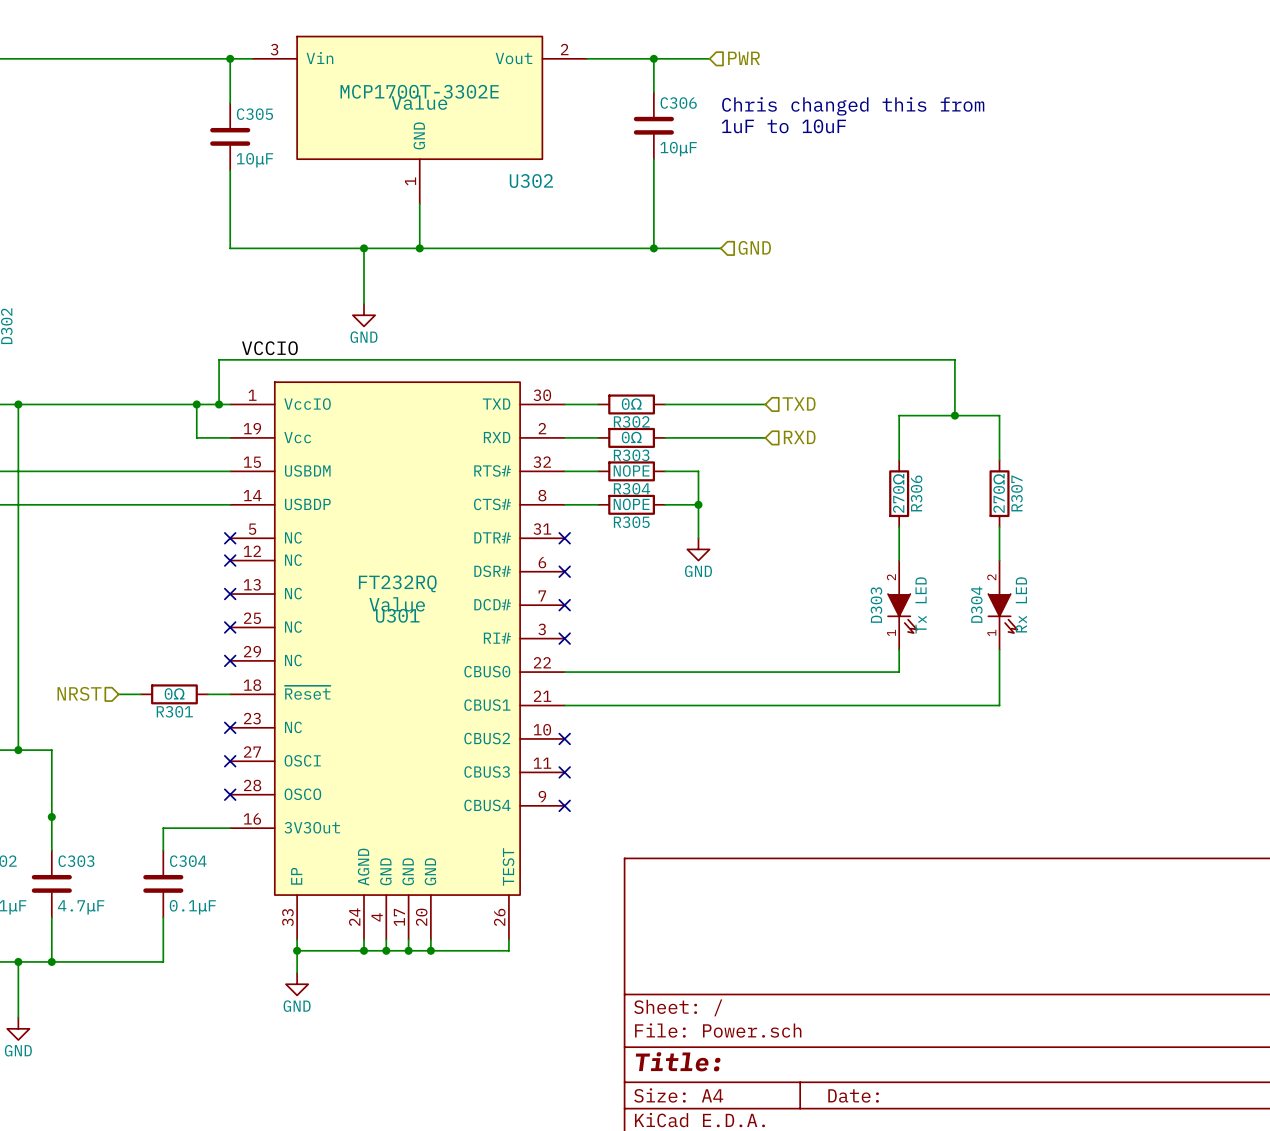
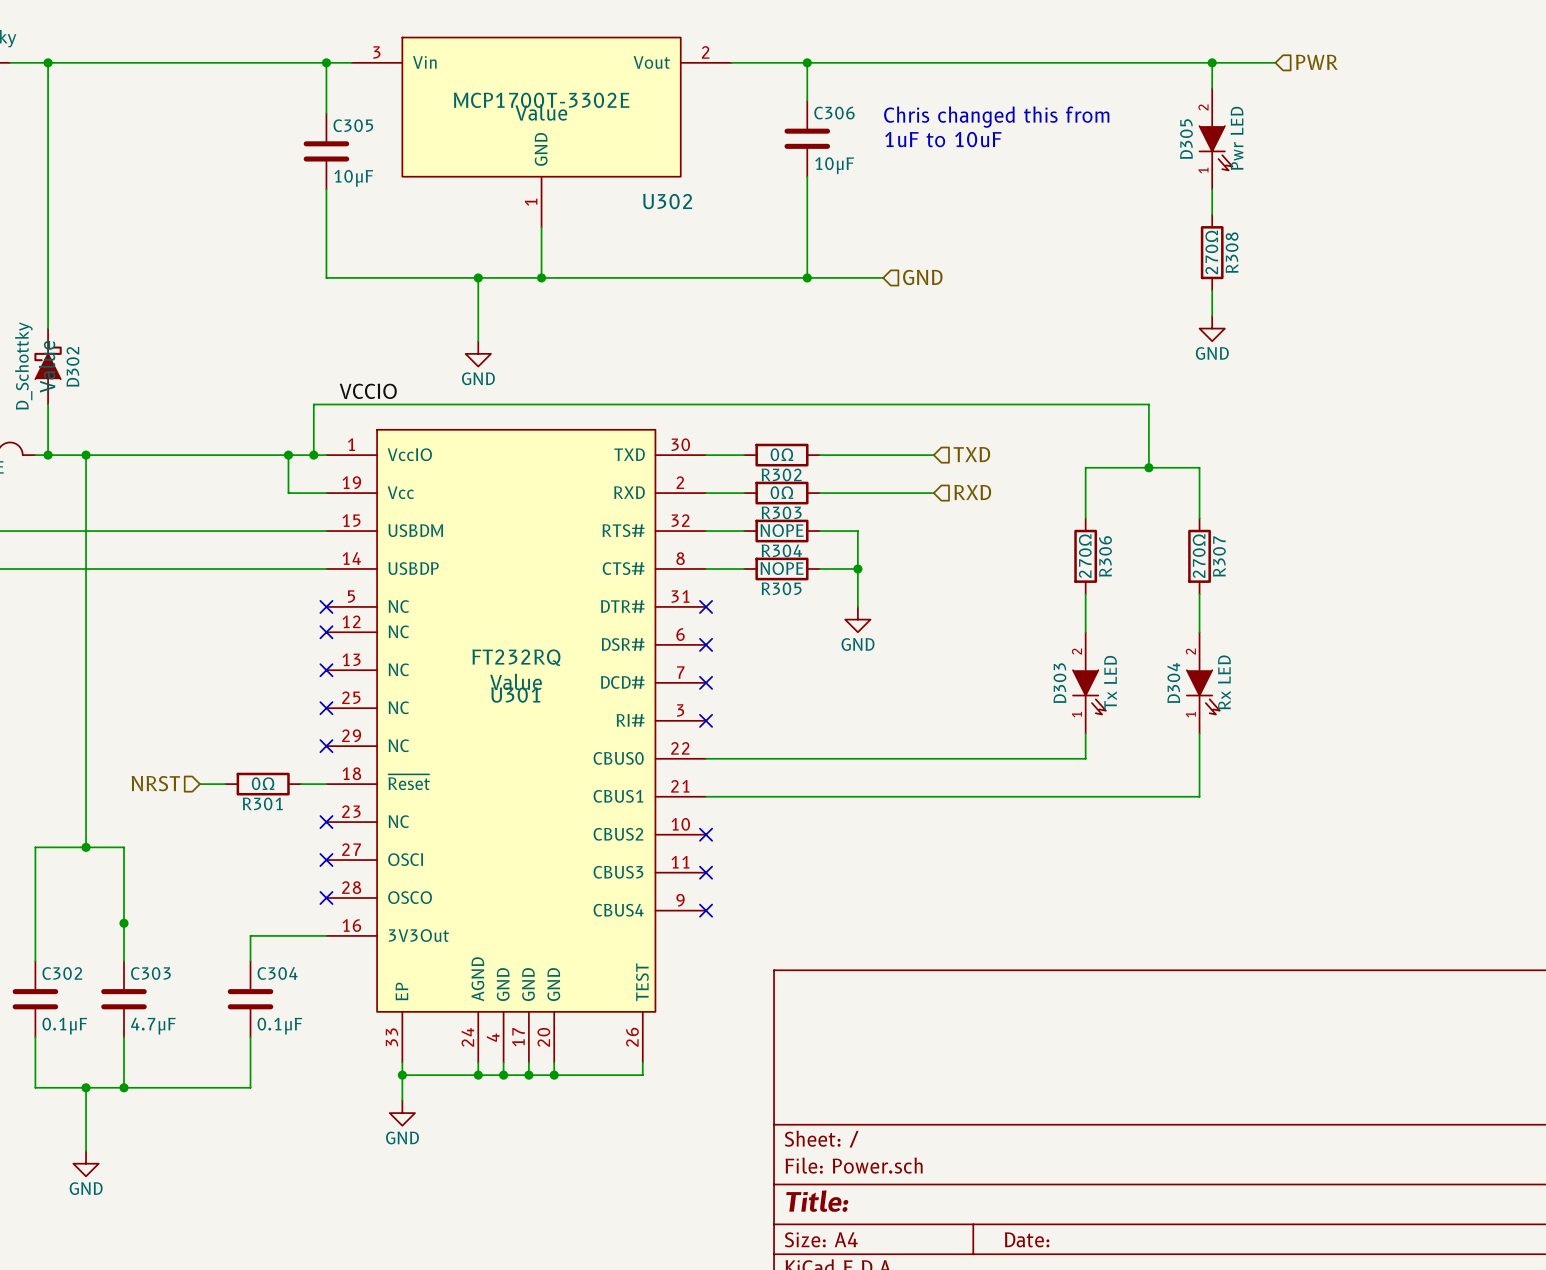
wire: none -> (870, 62) (1275, 62)
hierarchical label: PWR (743, 58) -> none
wire: none -> (1212, 62) (1212, 88)
junction: none -> (1212, 62)
hierarchical label: none -> PWR (1316, 62)
D305: none -> Pwr LED (1215, 138)
wire: none -> (1212, 189) (1212, 214)
R308: none -> 270Ω (1212, 252)
wire: none -> (1212, 290) (1212, 315)
power symbol: none -> GND (1212, 328)

